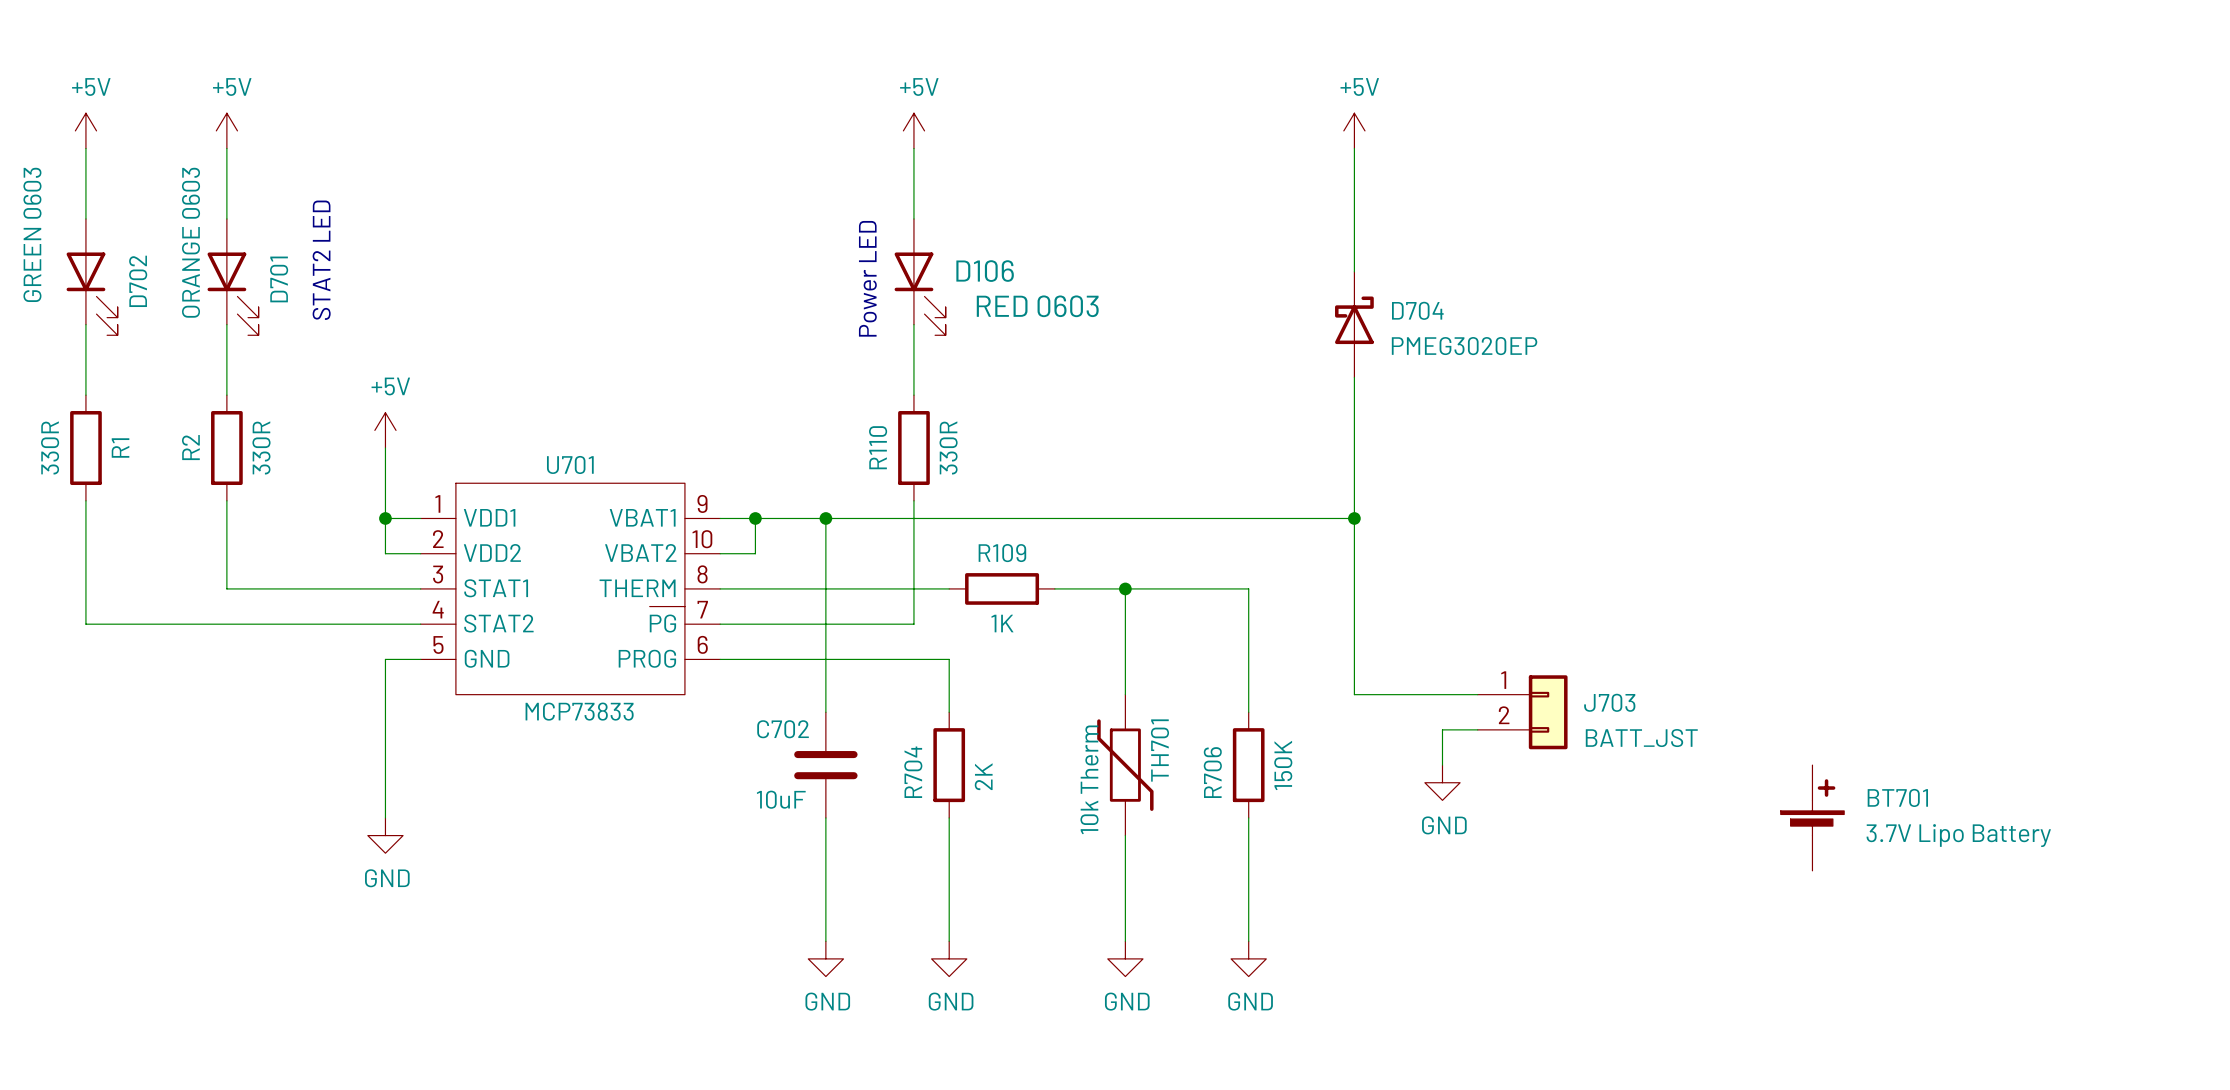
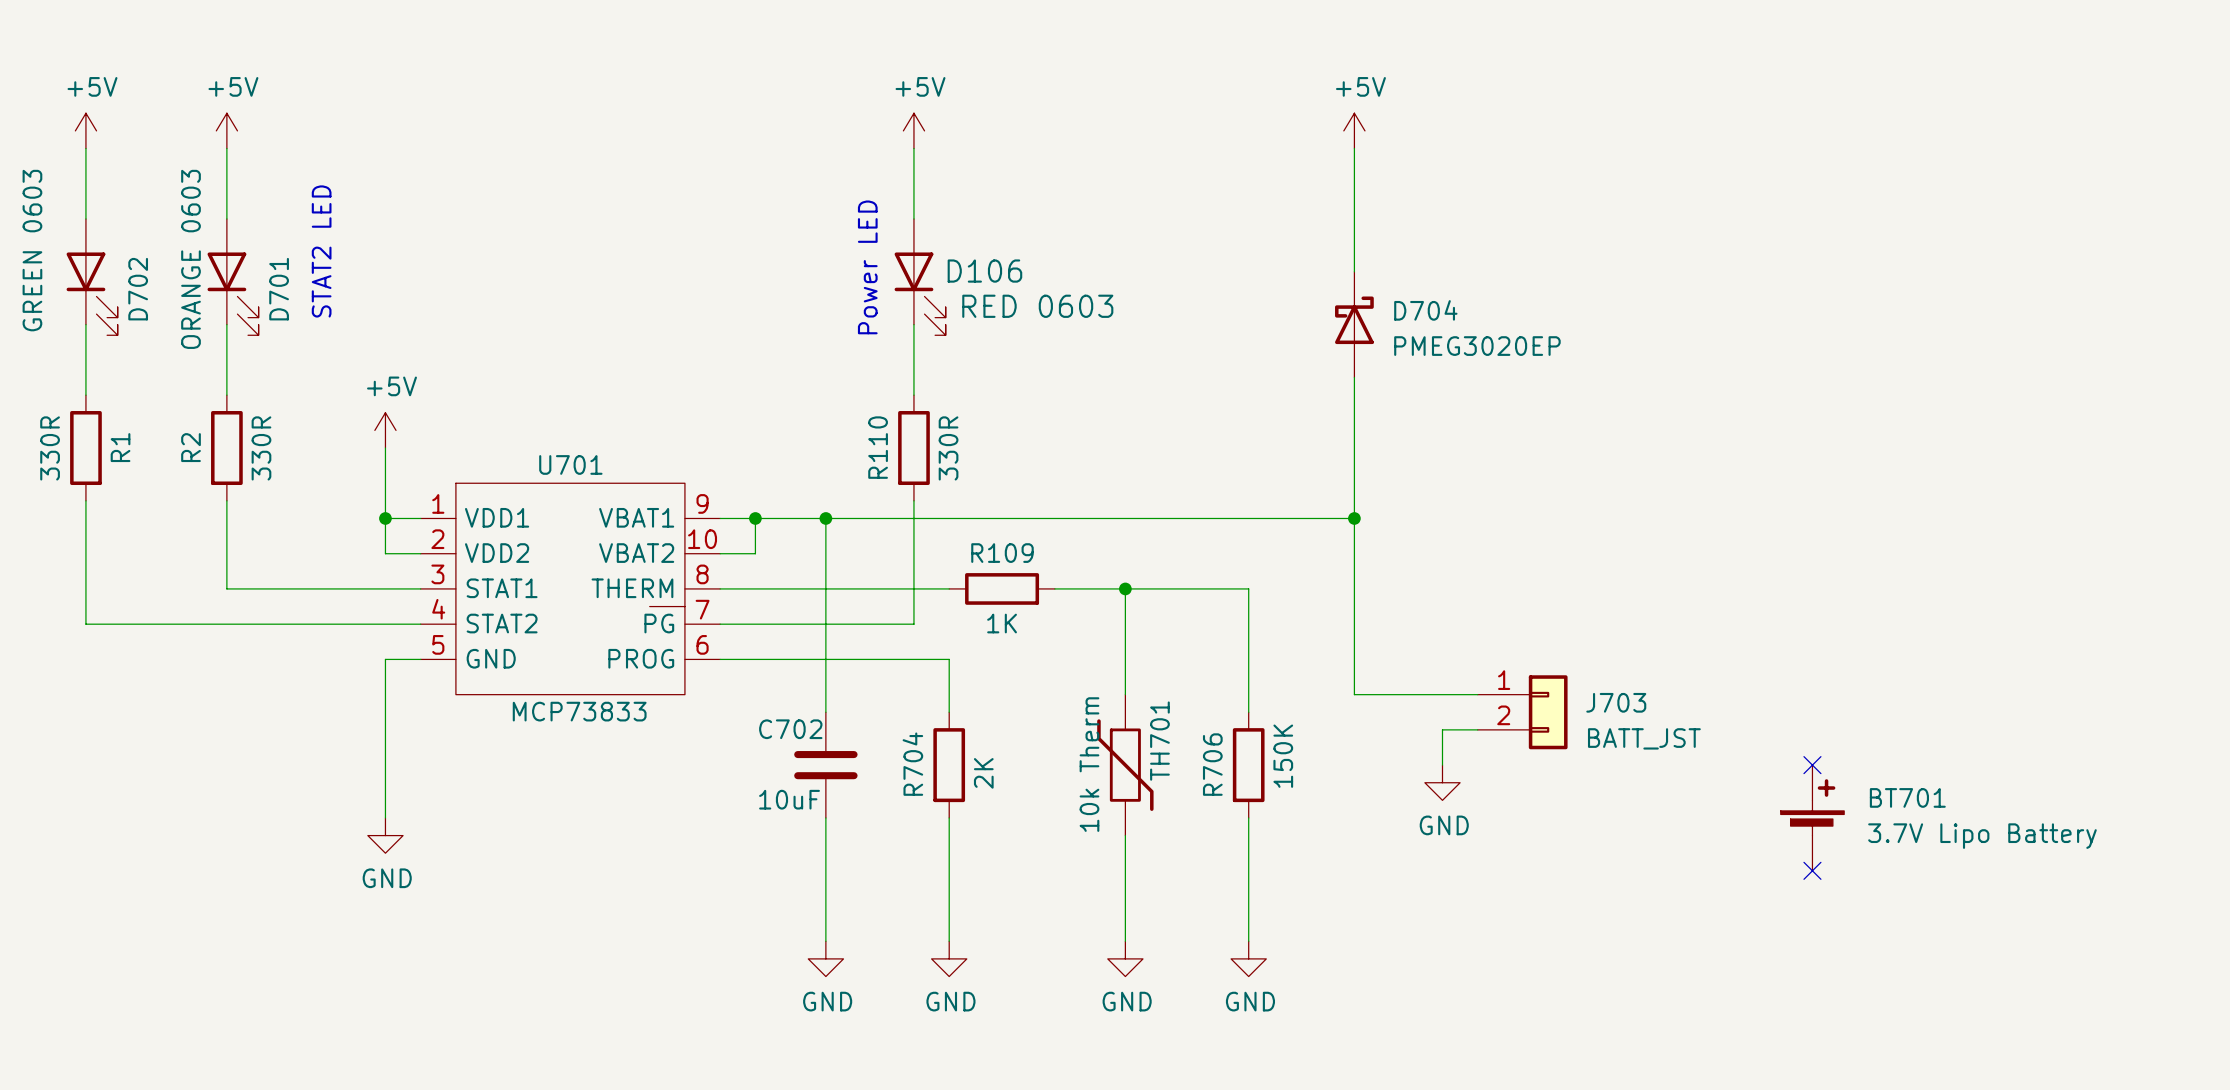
no-connect mark: none -> (1812, 765)
no-connect mark: none -> (1812, 870)

